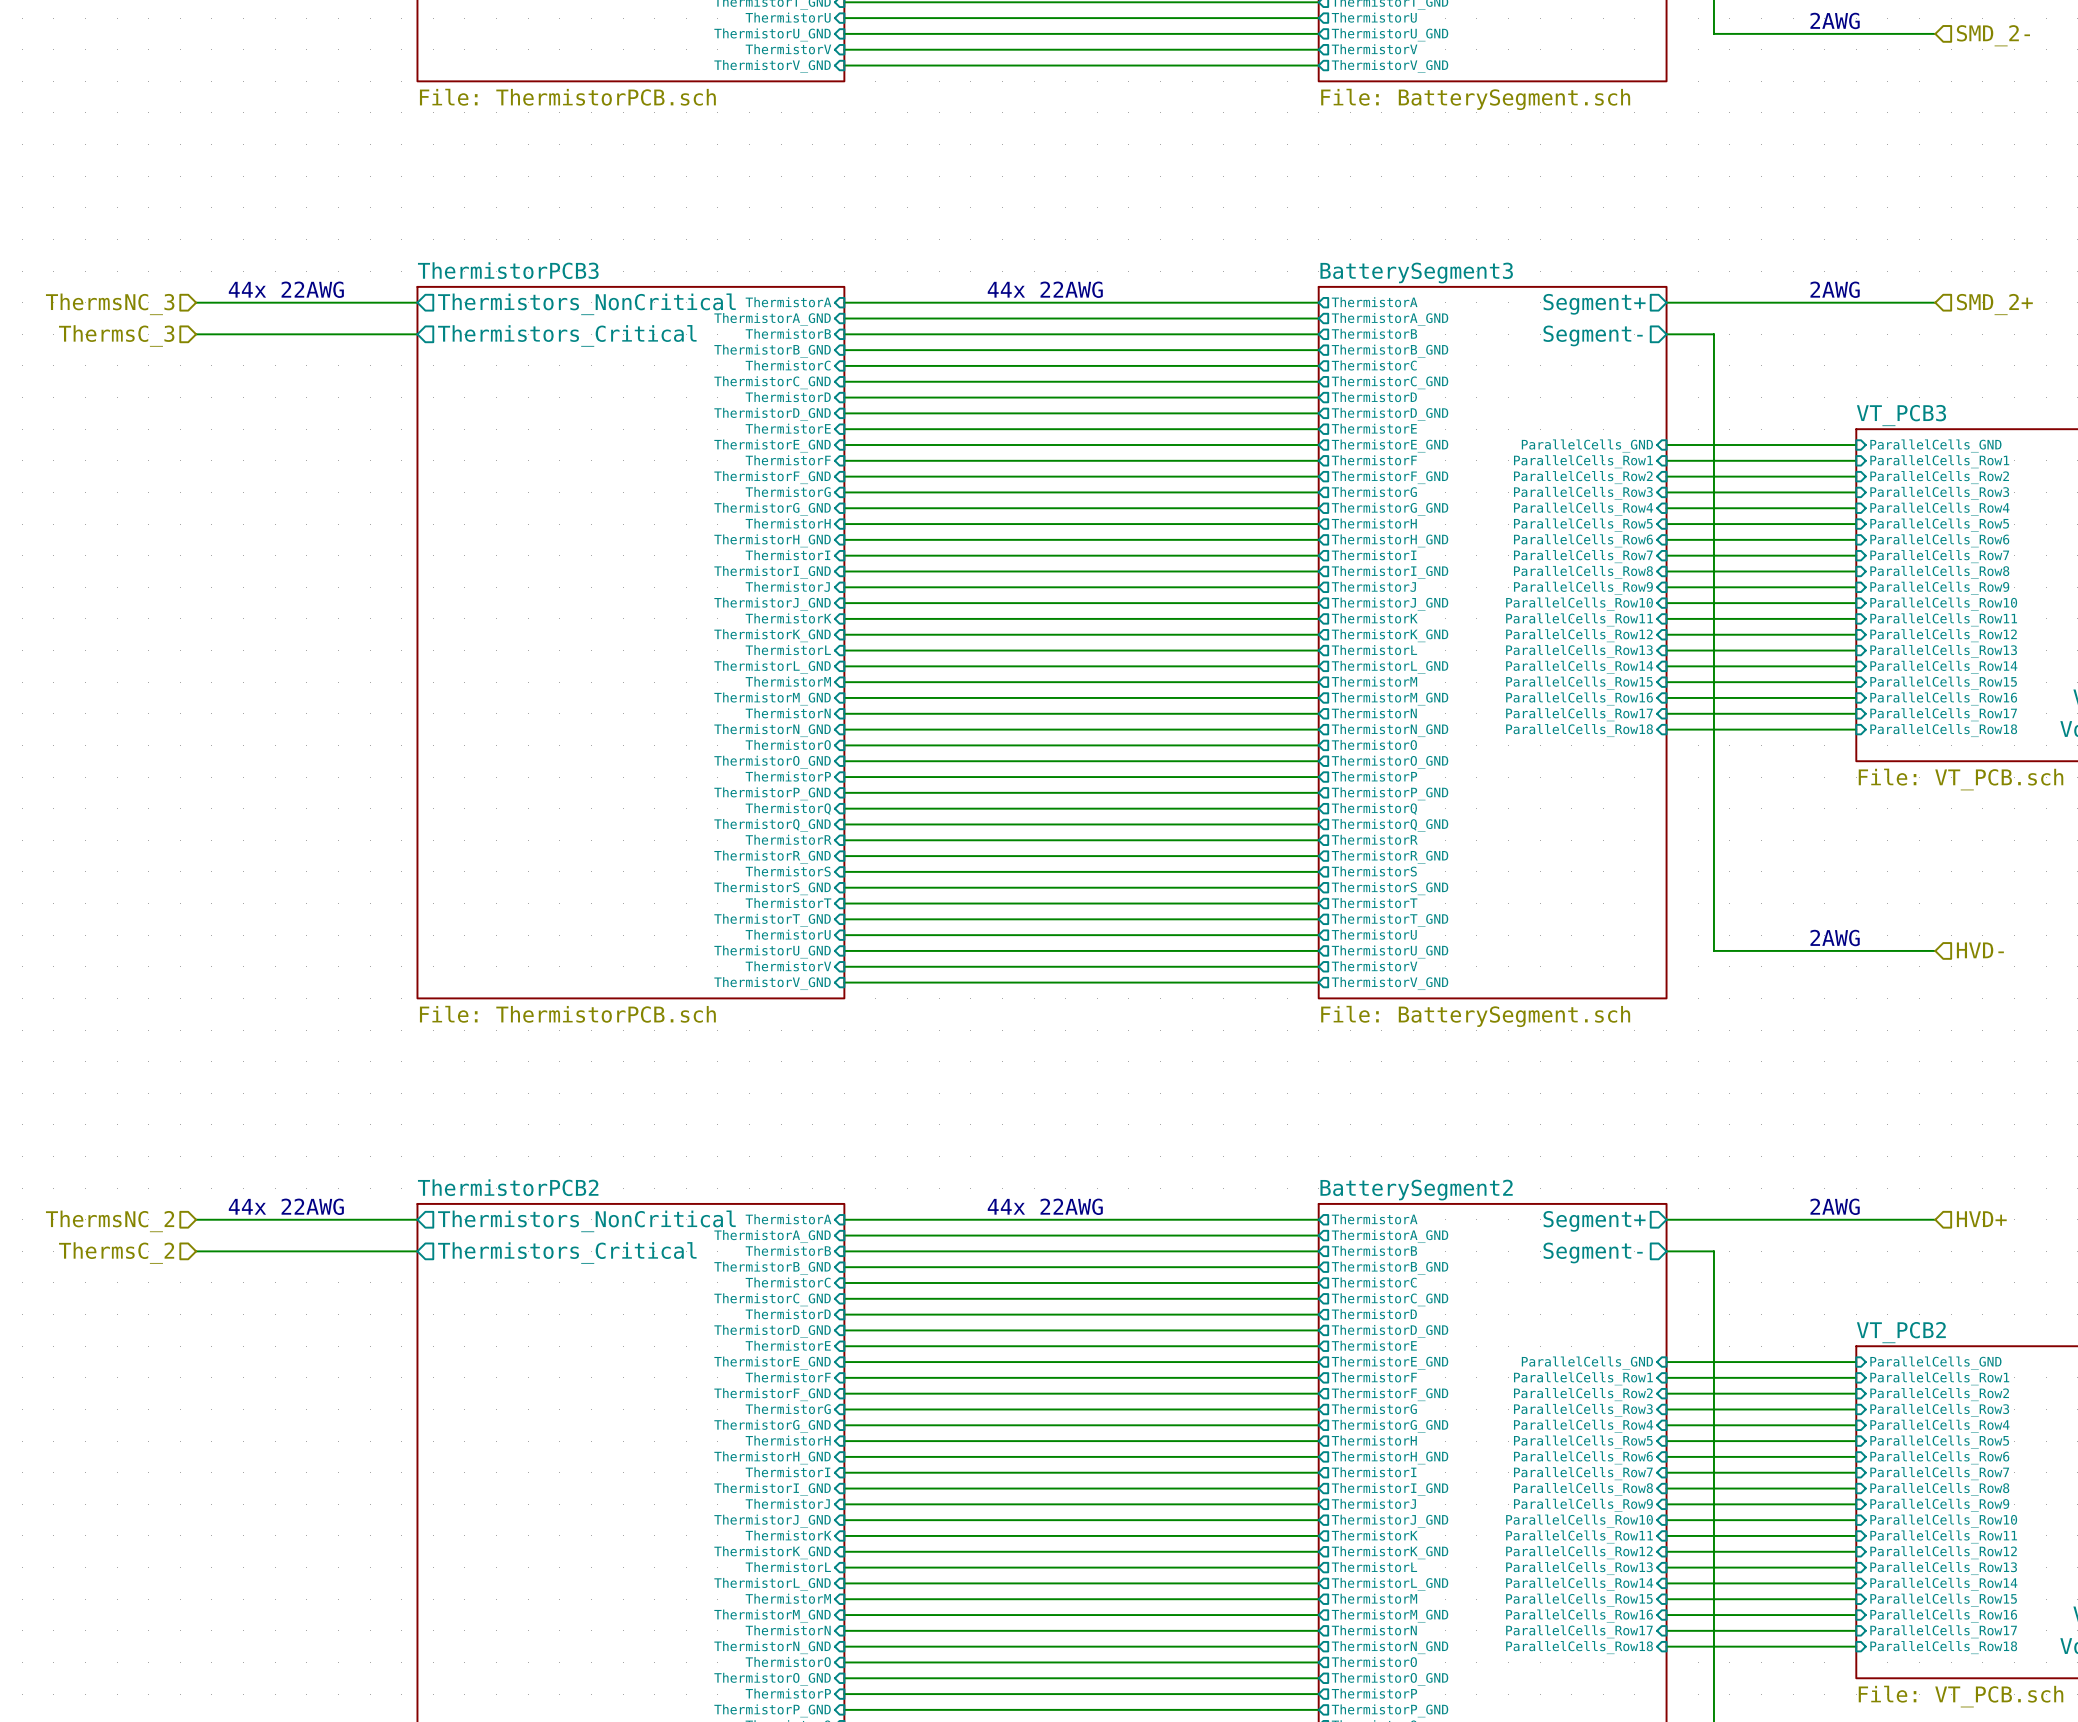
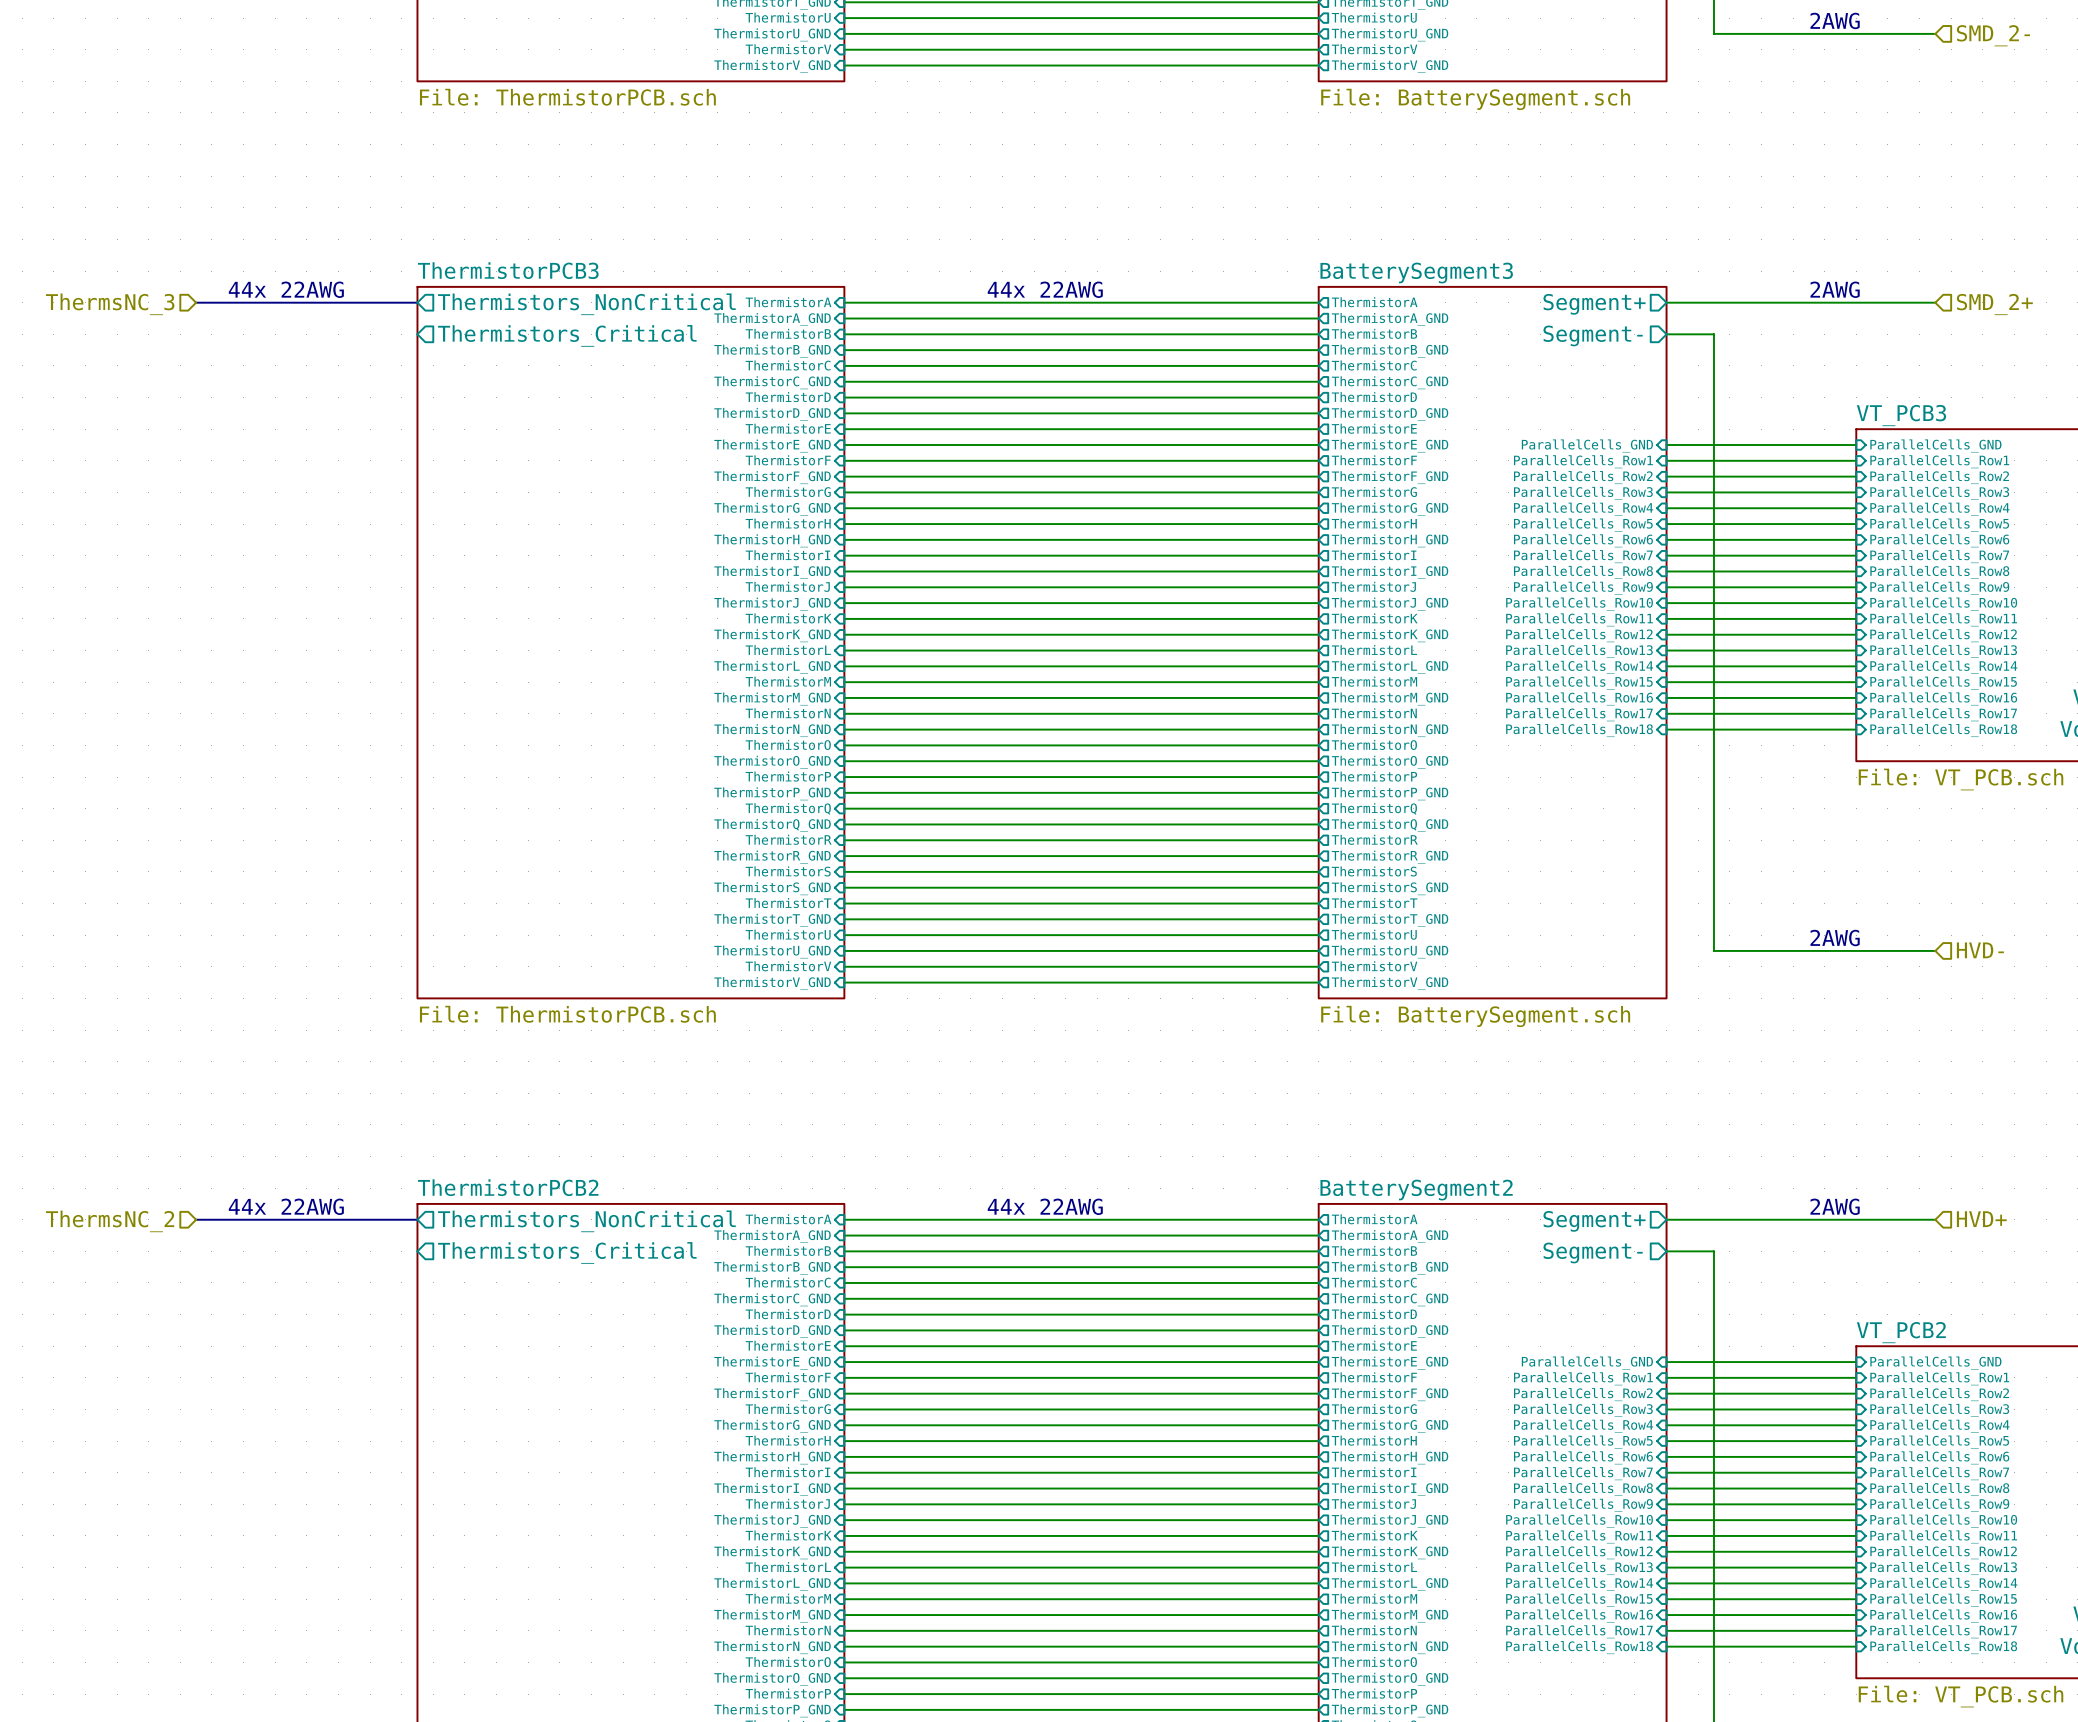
bus: none -> (196, 302) (417, 302)
wire: (196, 334) (417, 334) -> none
hierarchical label: ThermsC_3 (116, 335) -> none
bus: none -> (196, 1219) (417, 1219)
wire: (196, 1251) (417, 1251) -> none
hierarchical label: ThermsC_2 (116, 1253) -> none

